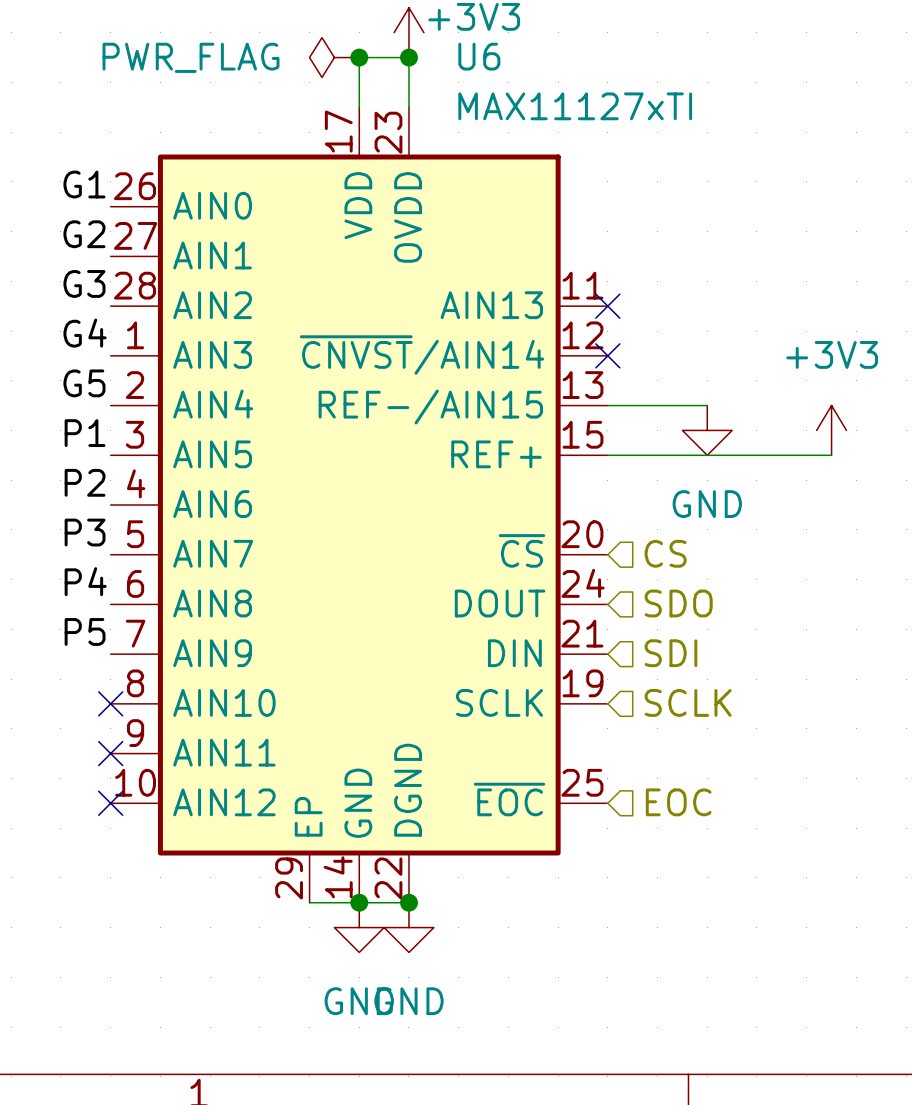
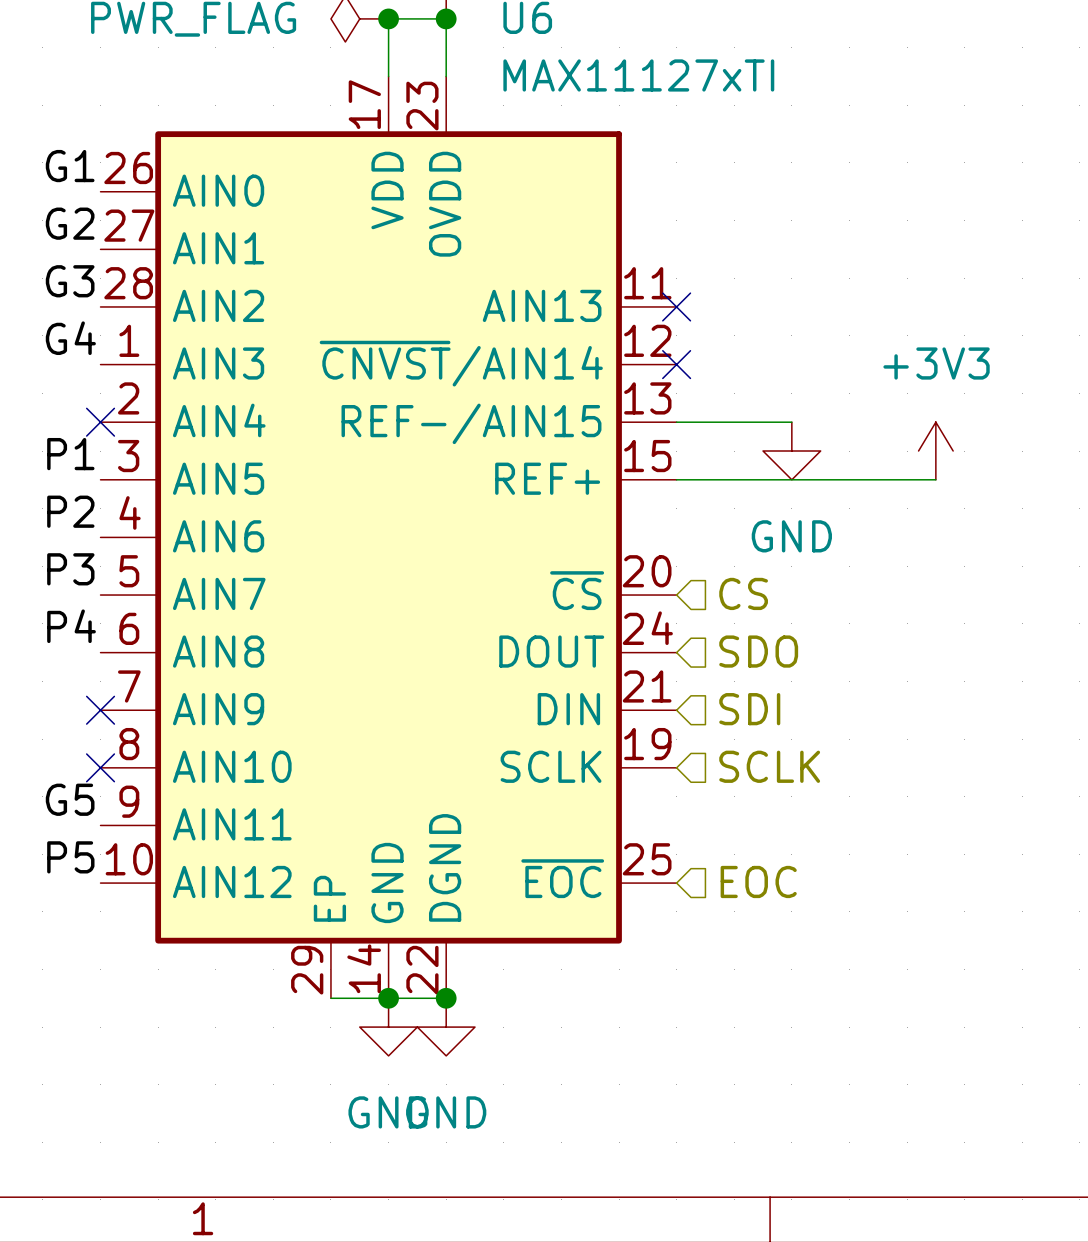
label position: G5 (84, 383) -> G5 (70, 799)
no-connect mark: none -> (100, 422)
label position: P5 (85, 631) -> P5 (70, 857)
no-connect mark: none -> (100, 710)
no-connect mark: (110, 753) -> none
no-connect mark: (110, 803) -> none

